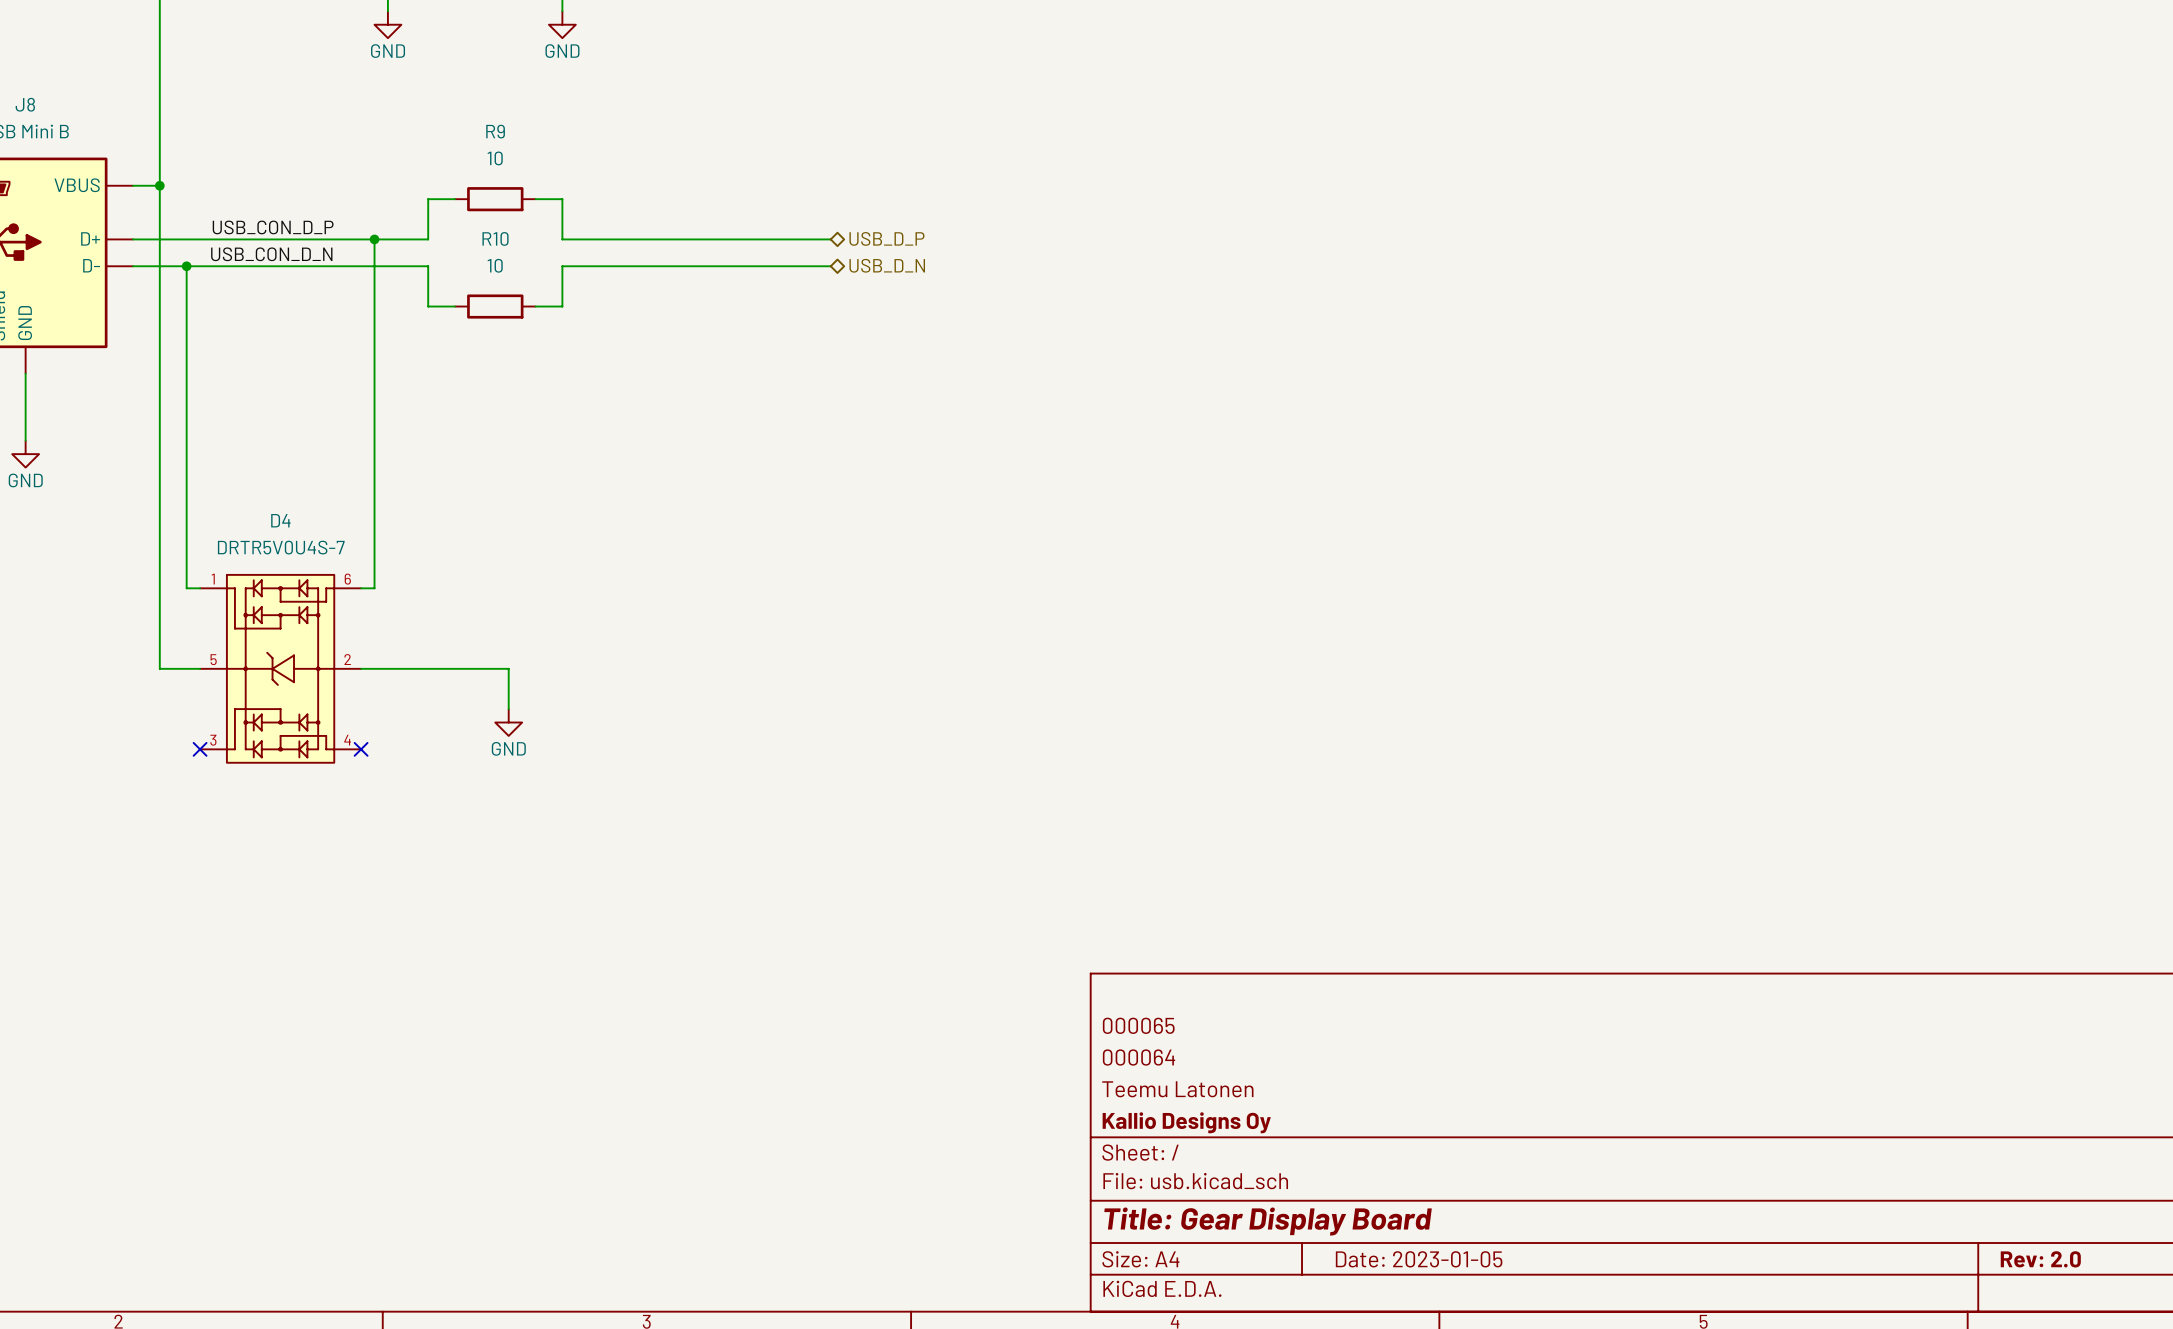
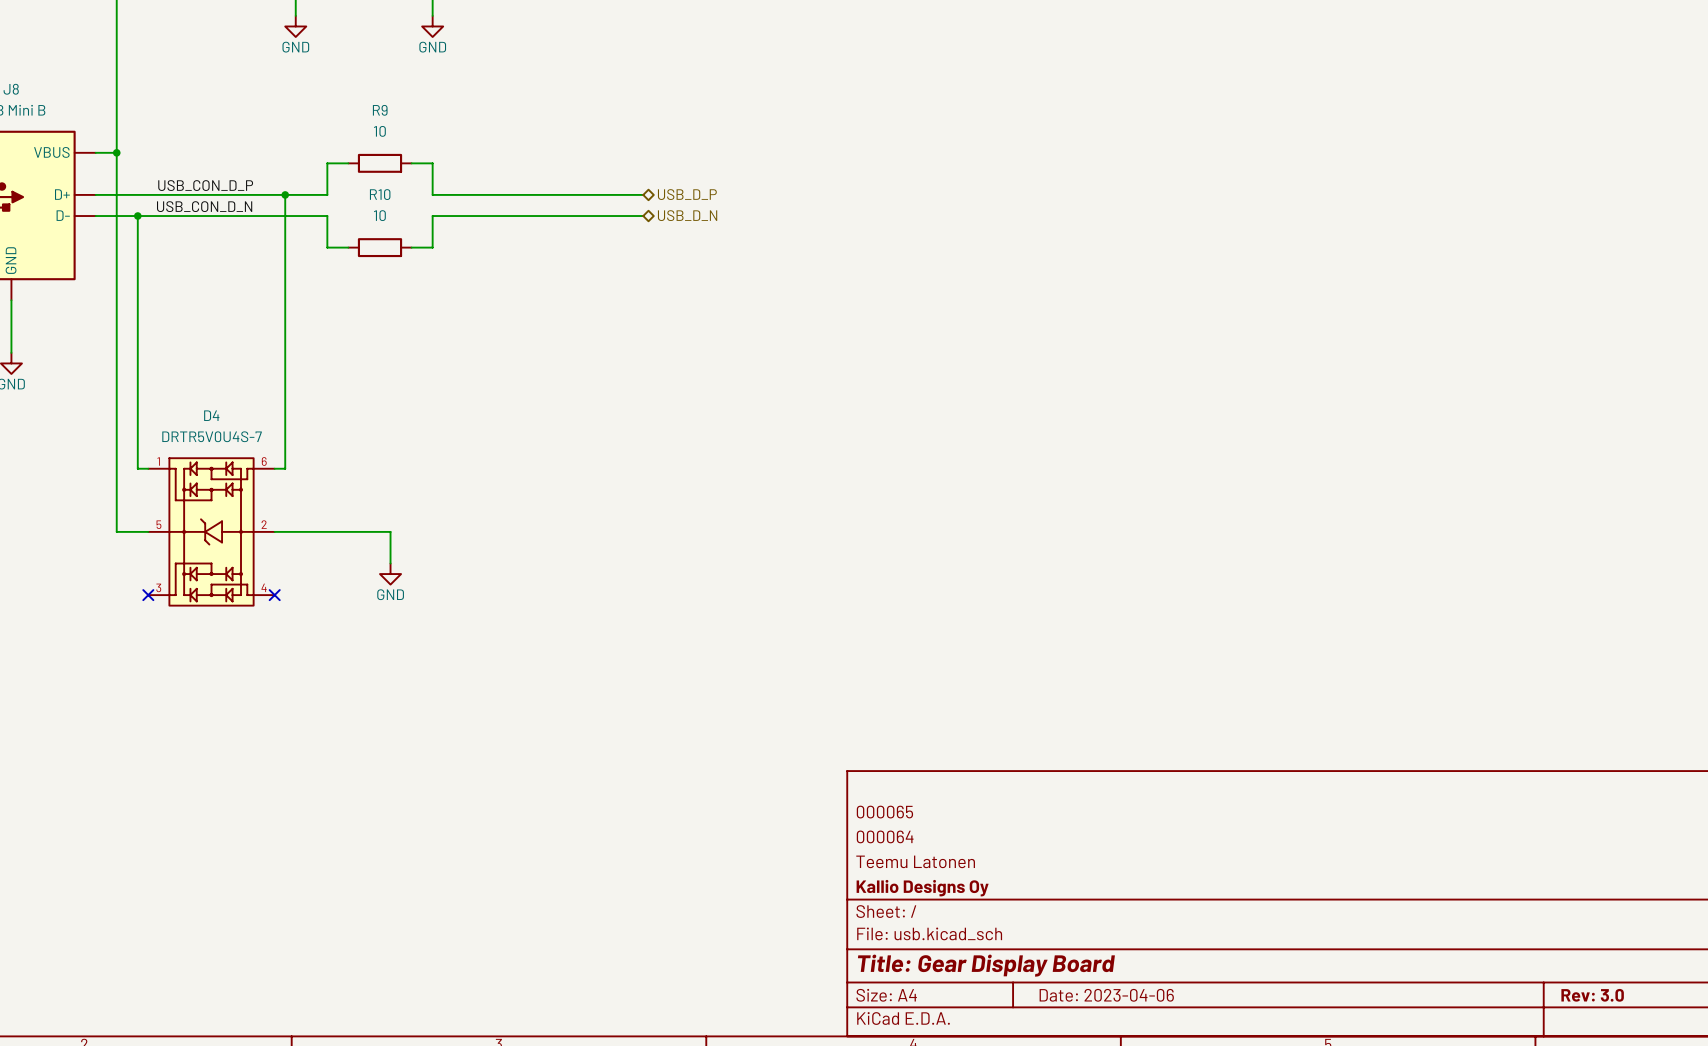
title block: Date: 2023-01-05 (1419, 1259) -> Date: 2023-04-06 (1106, 995)
title block: Rev: 2.0 (2040, 1259) -> Rev: 3.0 (1592, 995)

